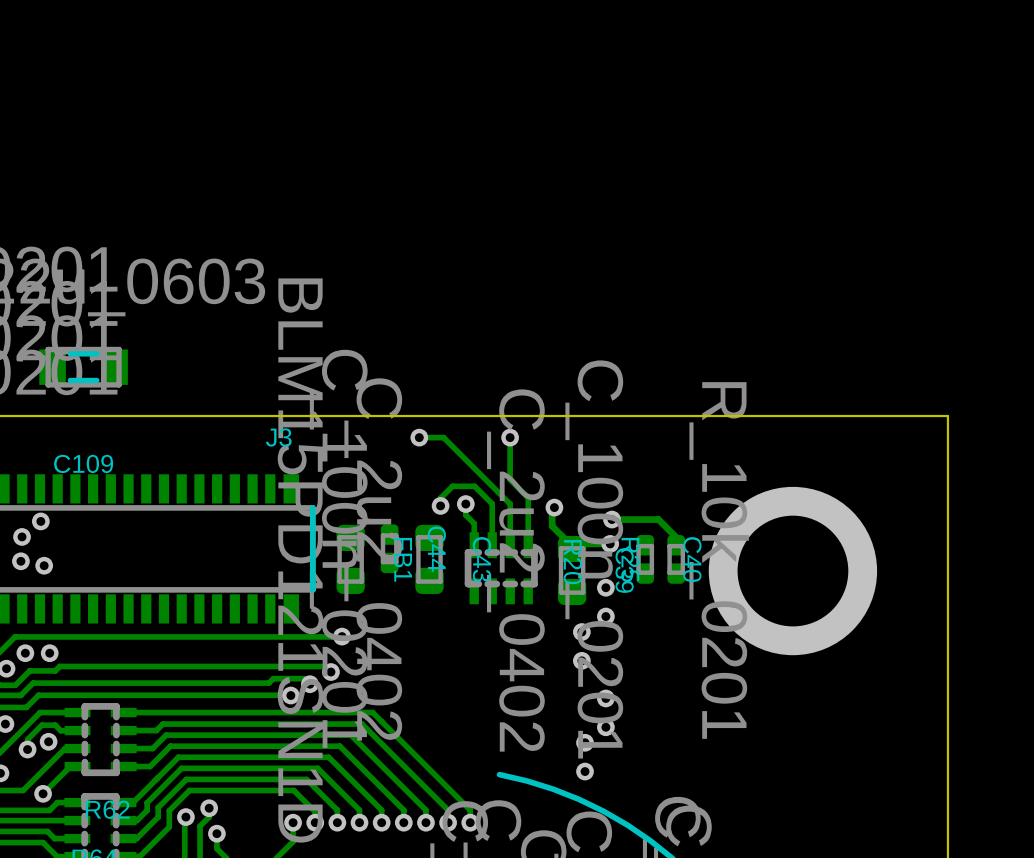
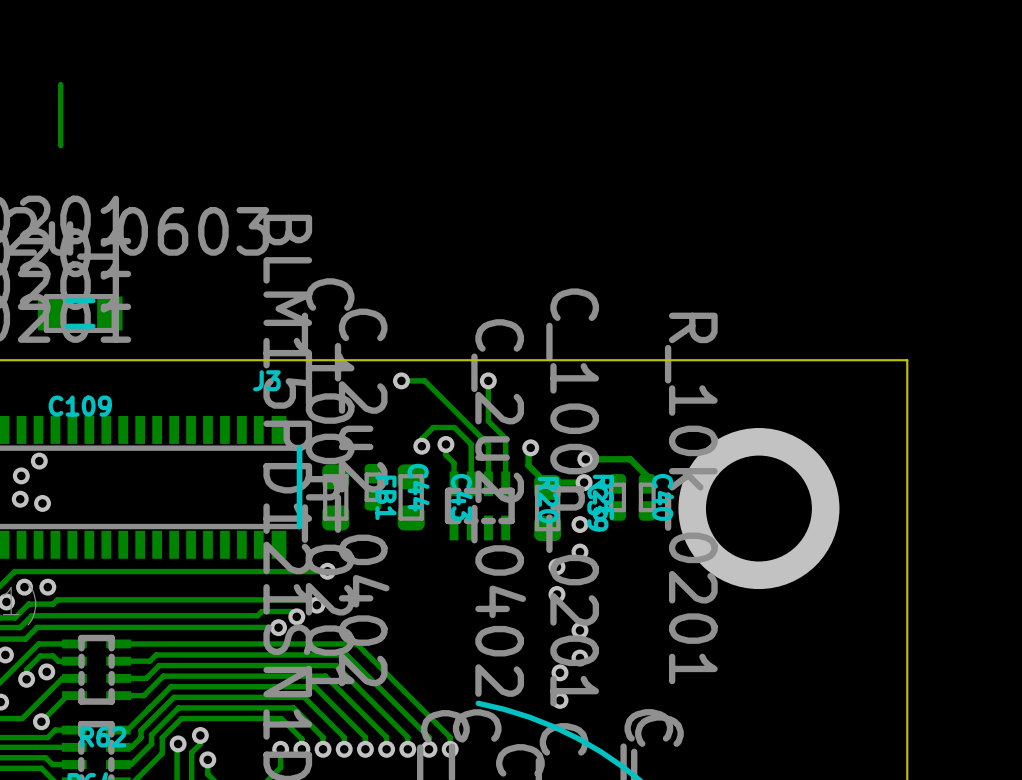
track: none -> (60, 84) (60, 145)

